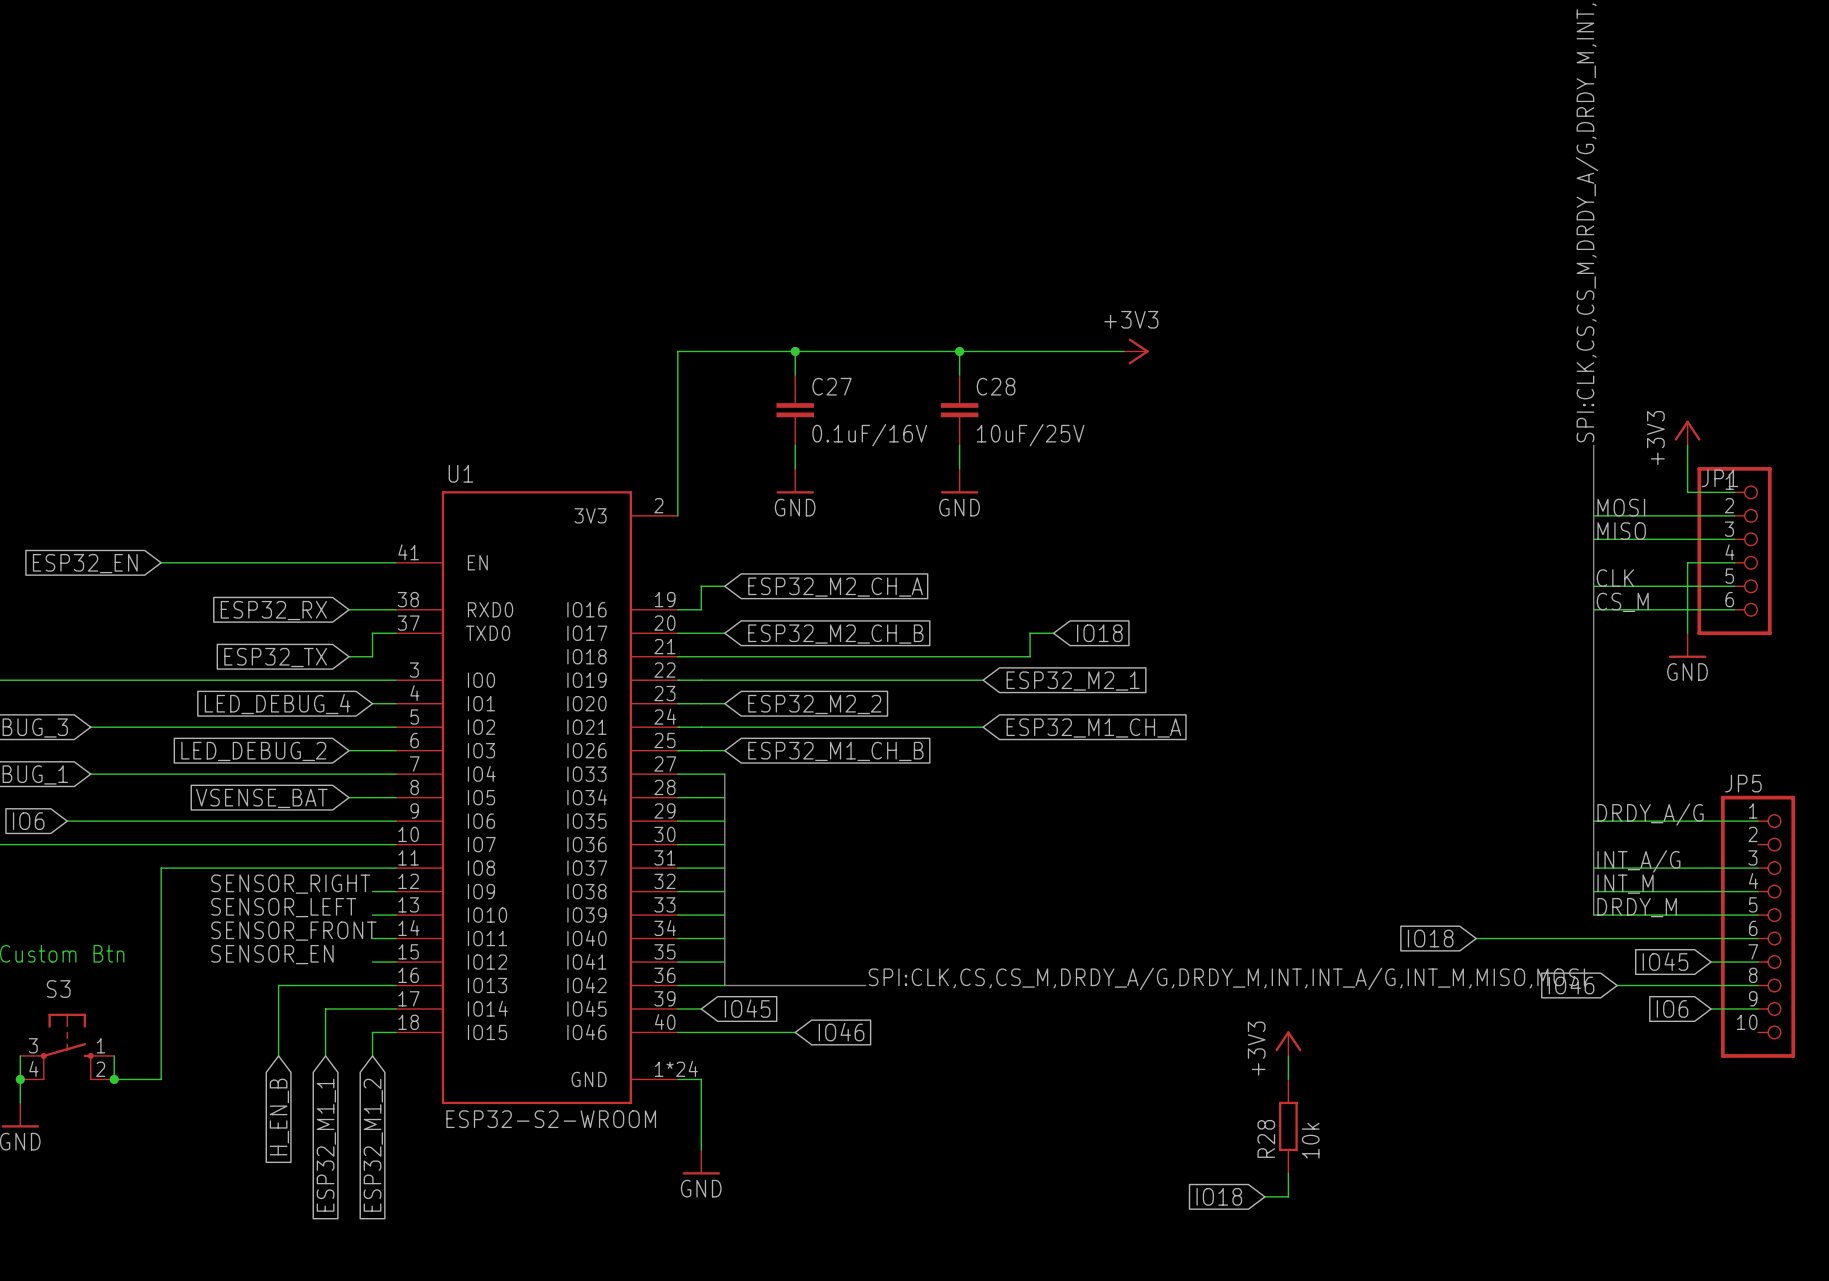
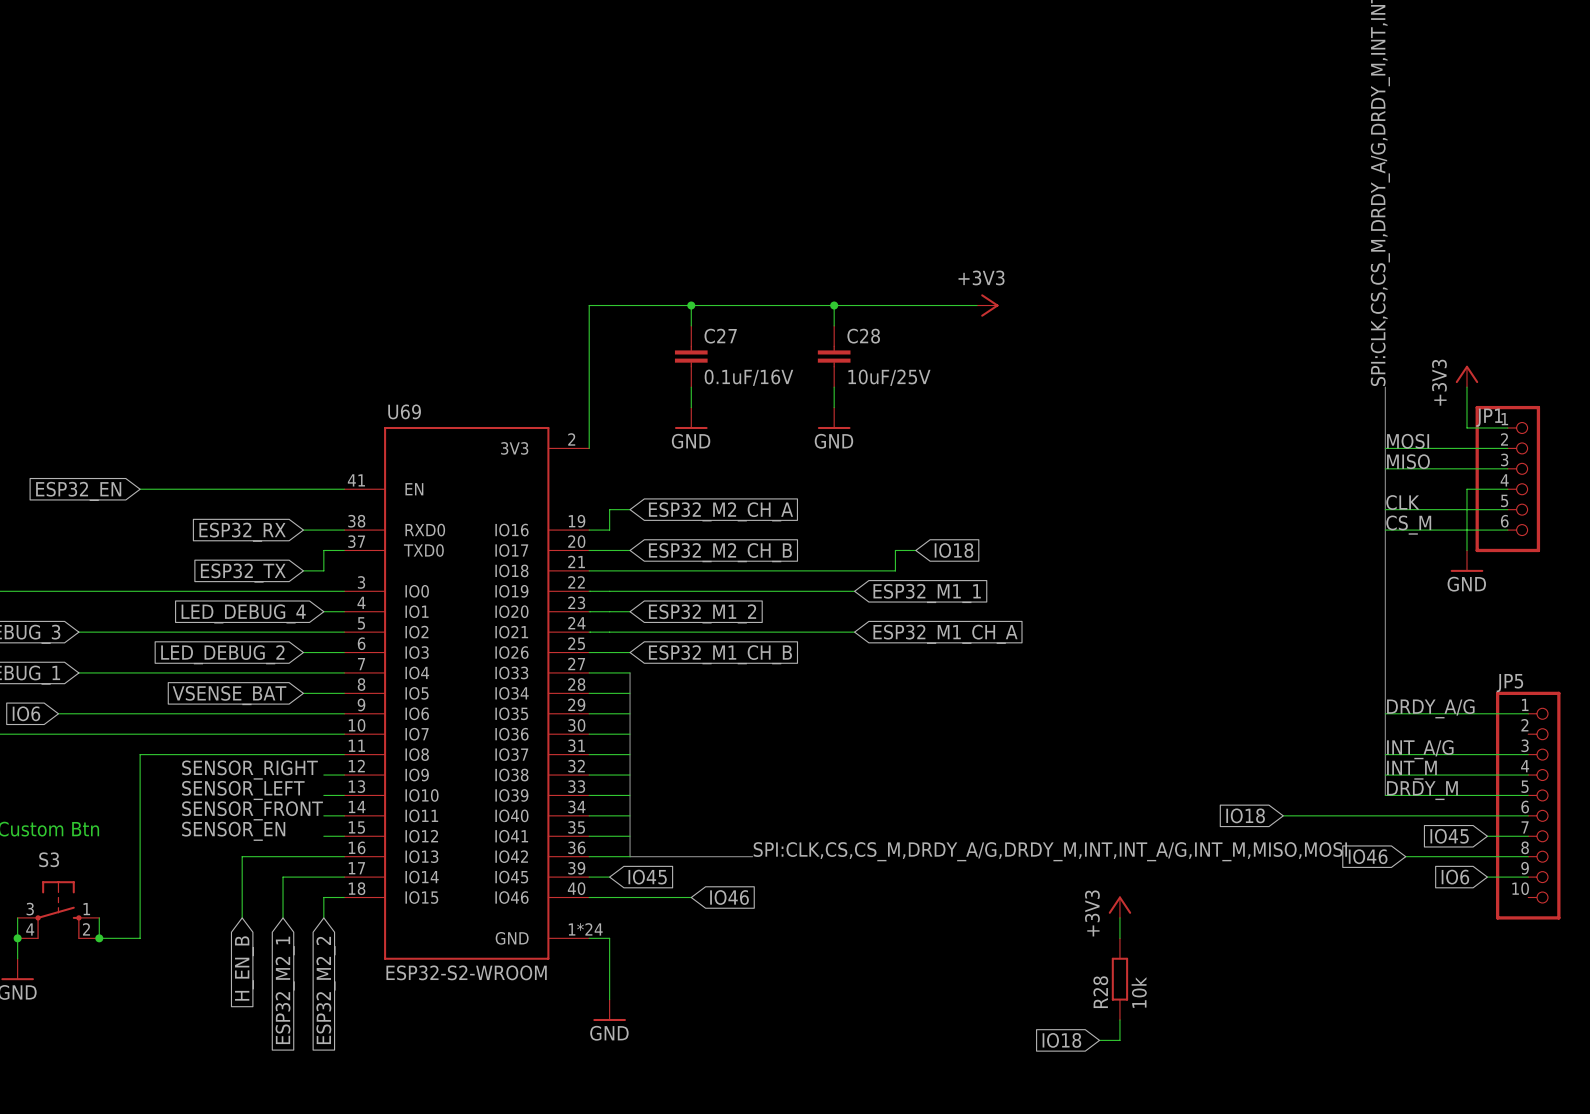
U1 name: U1 (460, 473) -> U69 (404, 411)
global label: ESP32_M2_1 (1073, 681) -> ESP32_M1_1 (927, 593)
global label: ESP32_M2_2 (814, 704) -> ESP32_M1_2 (702, 613)
global label: ESP32_M1_1 (326, 1145) -> ESP32_M2_1 (285, 990)
global label: ESP32_M1_2 (373, 1145) -> ESP32_M2_2 (326, 990)

